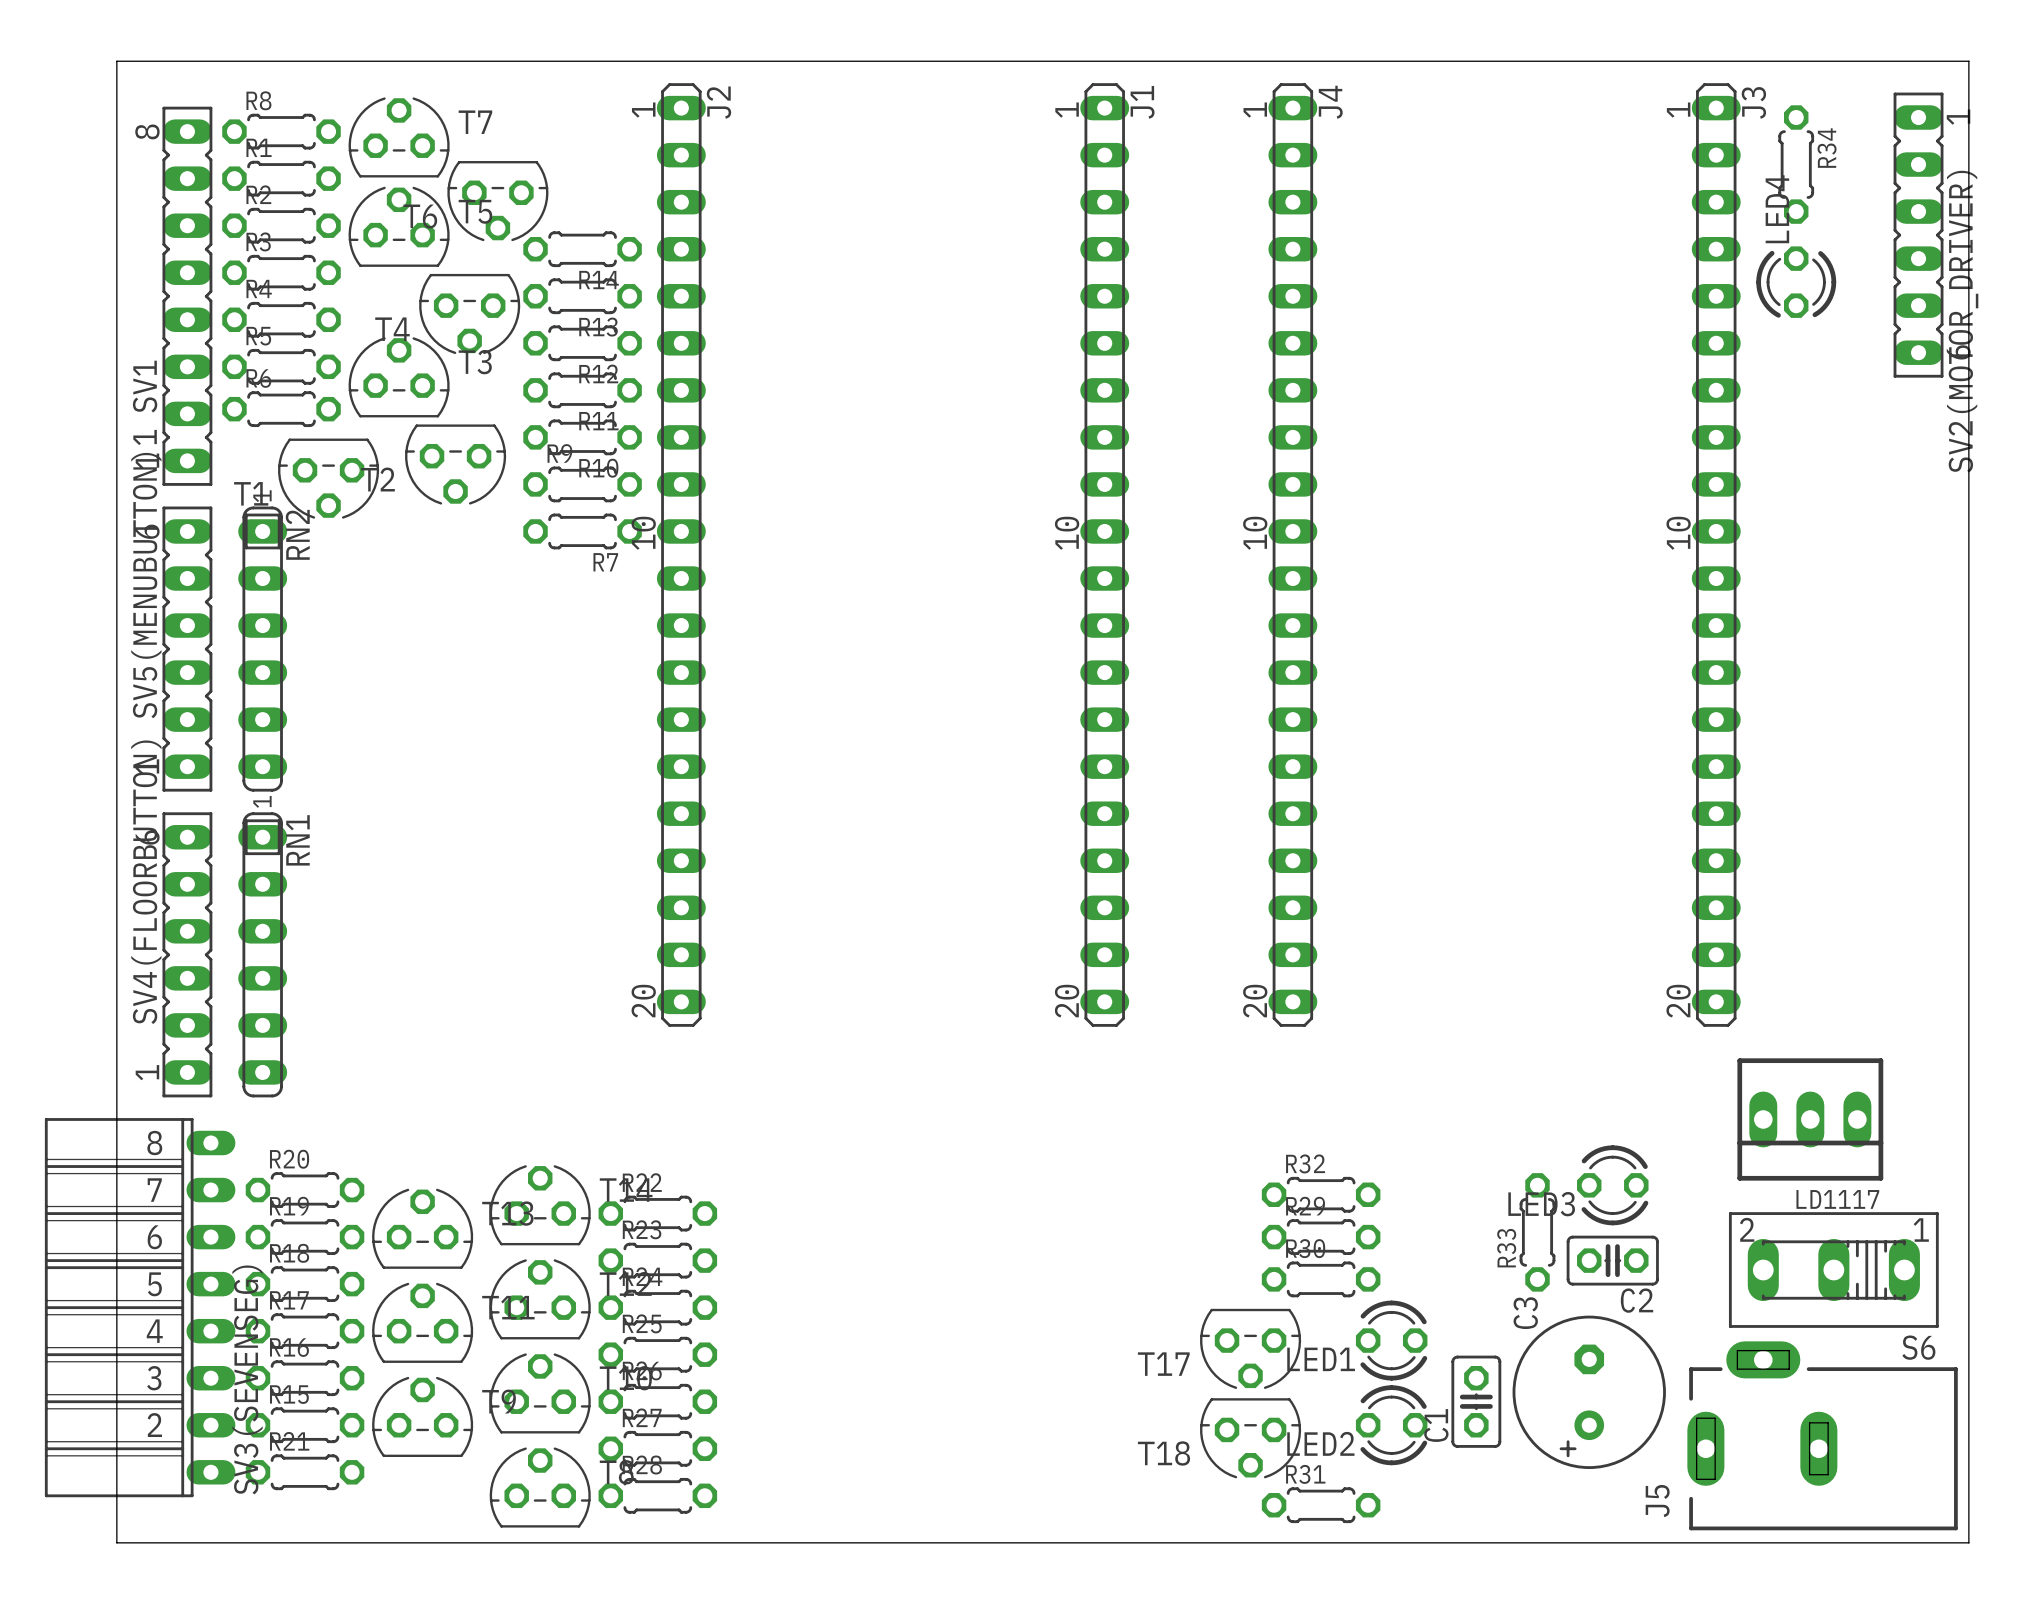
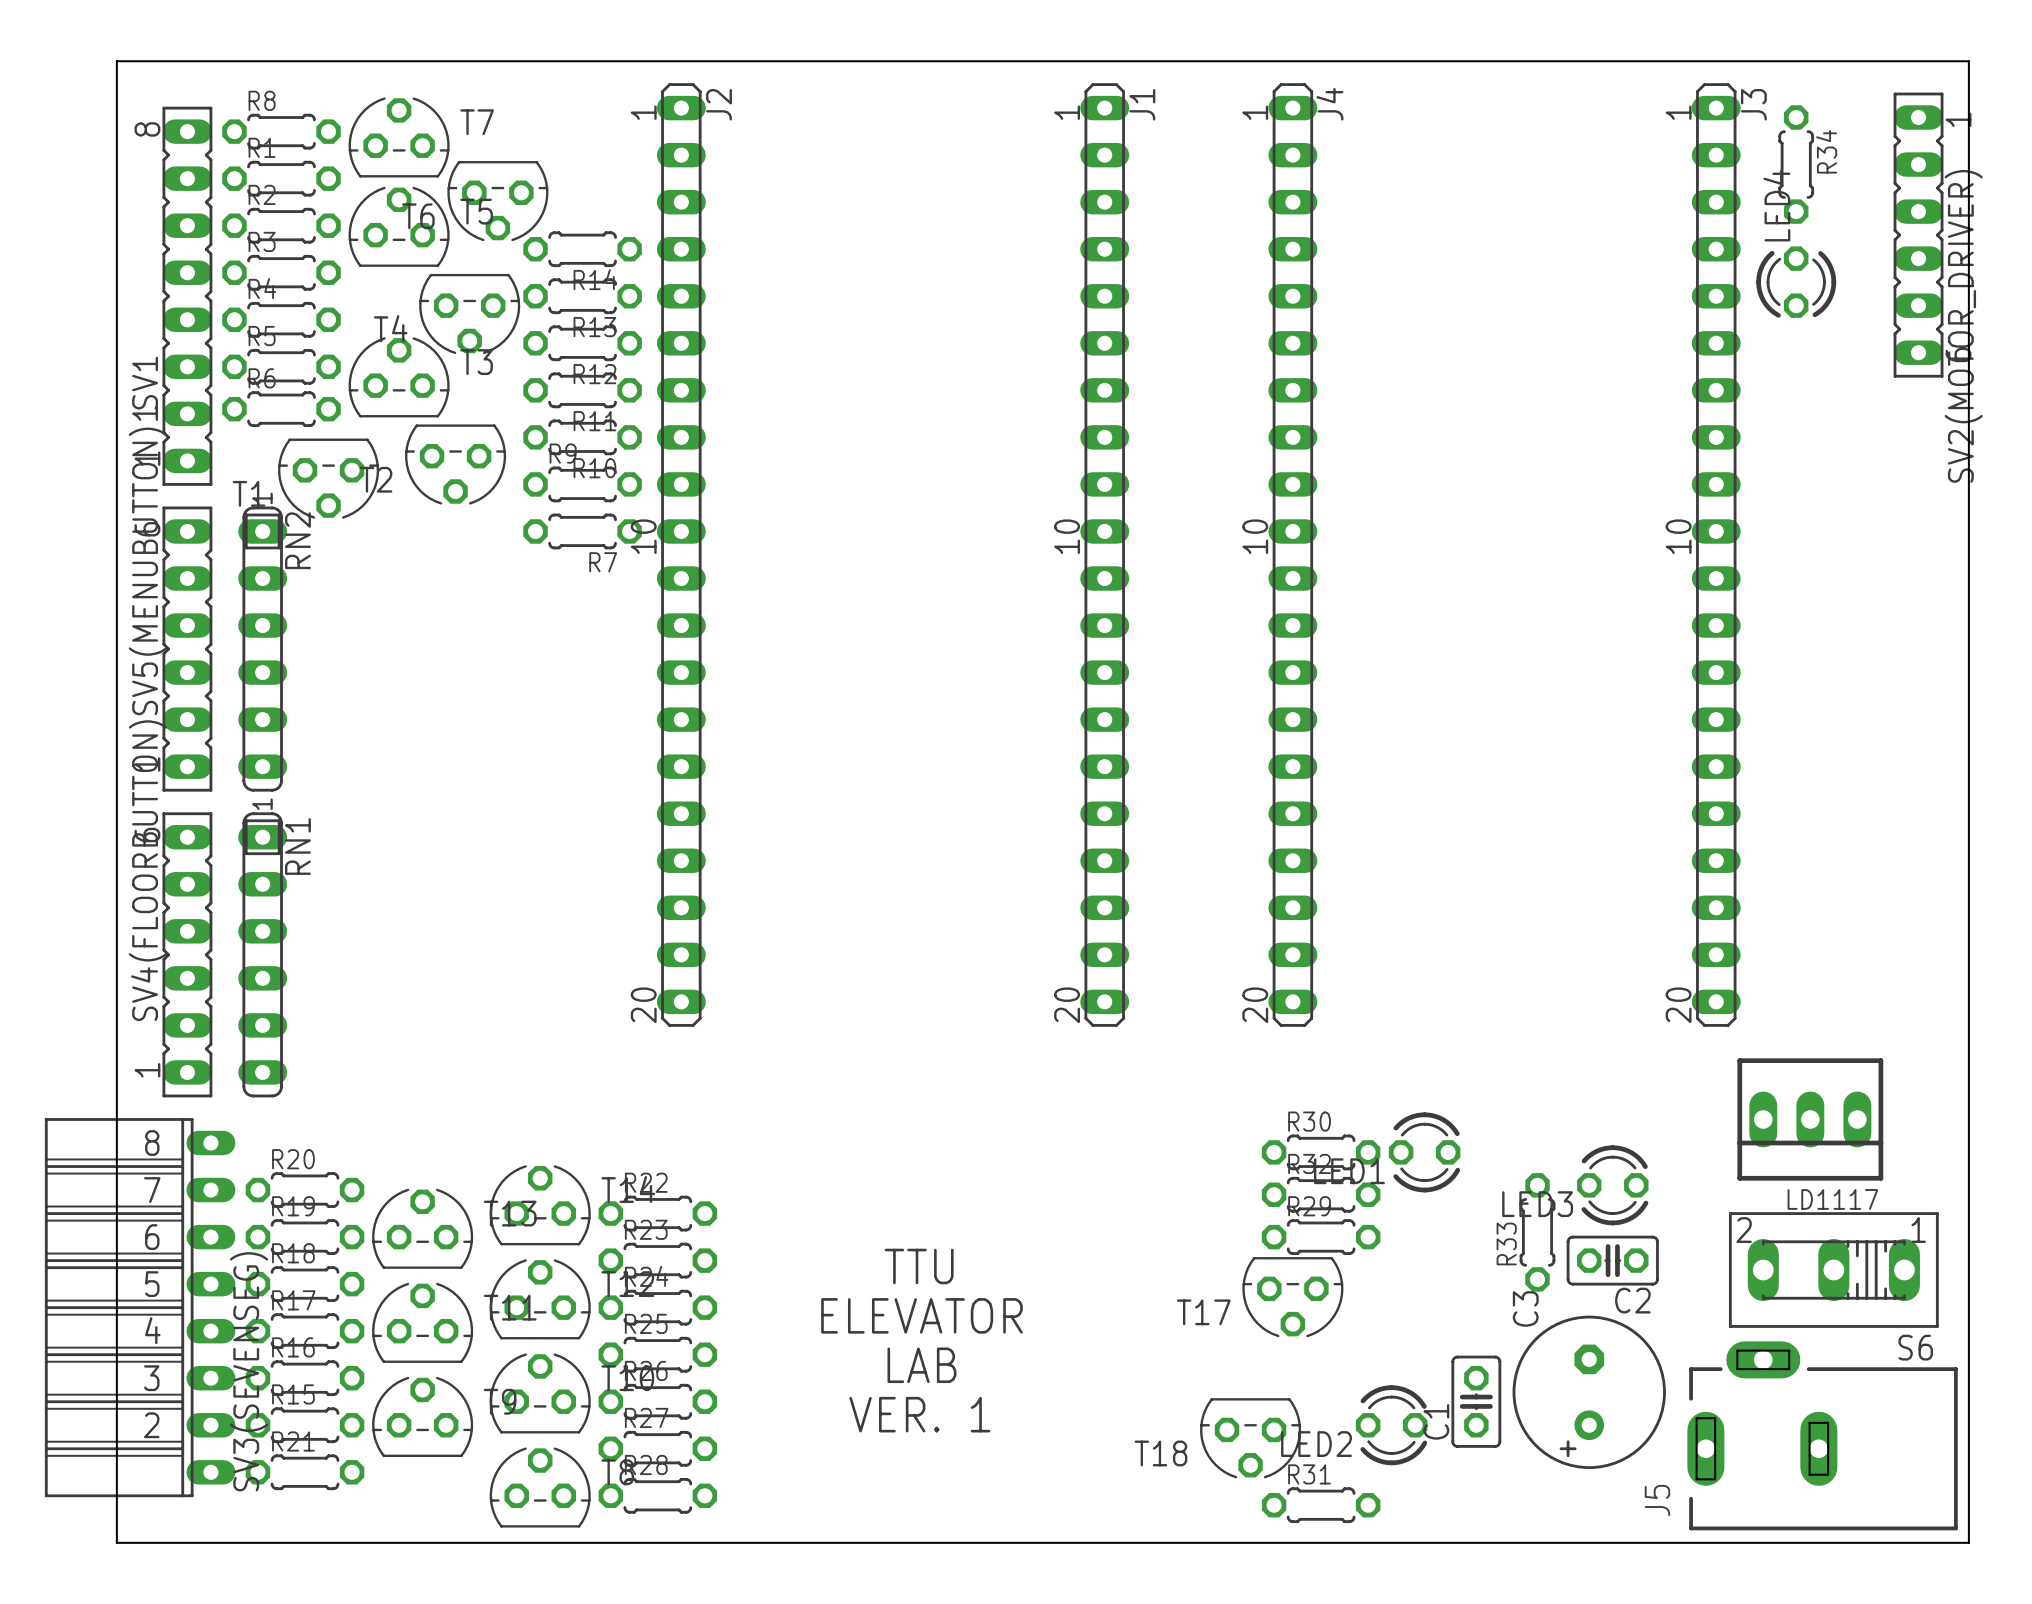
text: none -> TTU (919, 1266)
R30 position: (1321, 1279) -> (1321, 1152)
text: none -> ELEVATOR (921, 1315)
LED1 position: (1391, 1340) -> (1424, 1152)
T17 position: (1250, 1348) -> (1292, 1297)
text: none -> LAB (921, 1365)
text: none -> VER. 1 (919, 1414)

